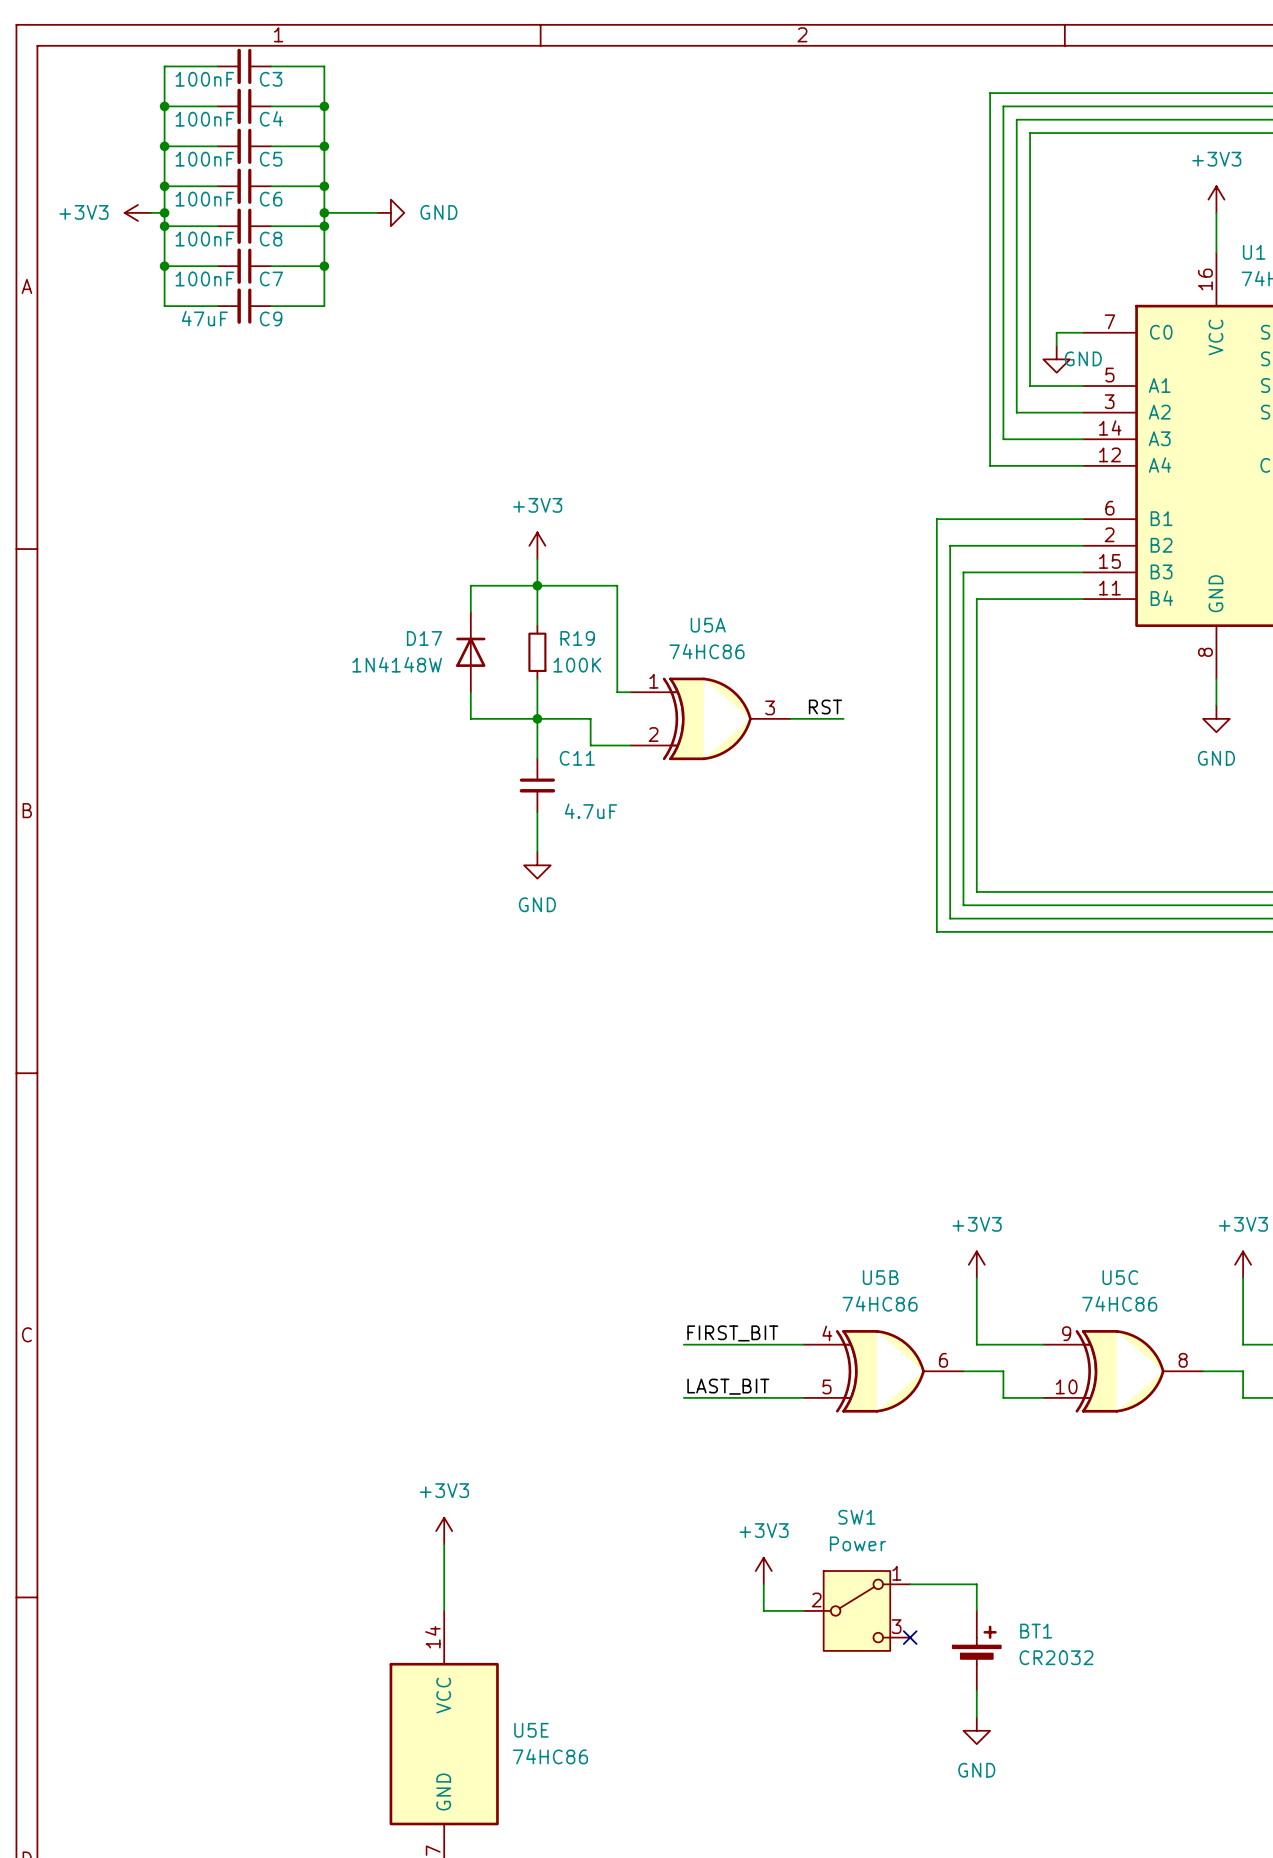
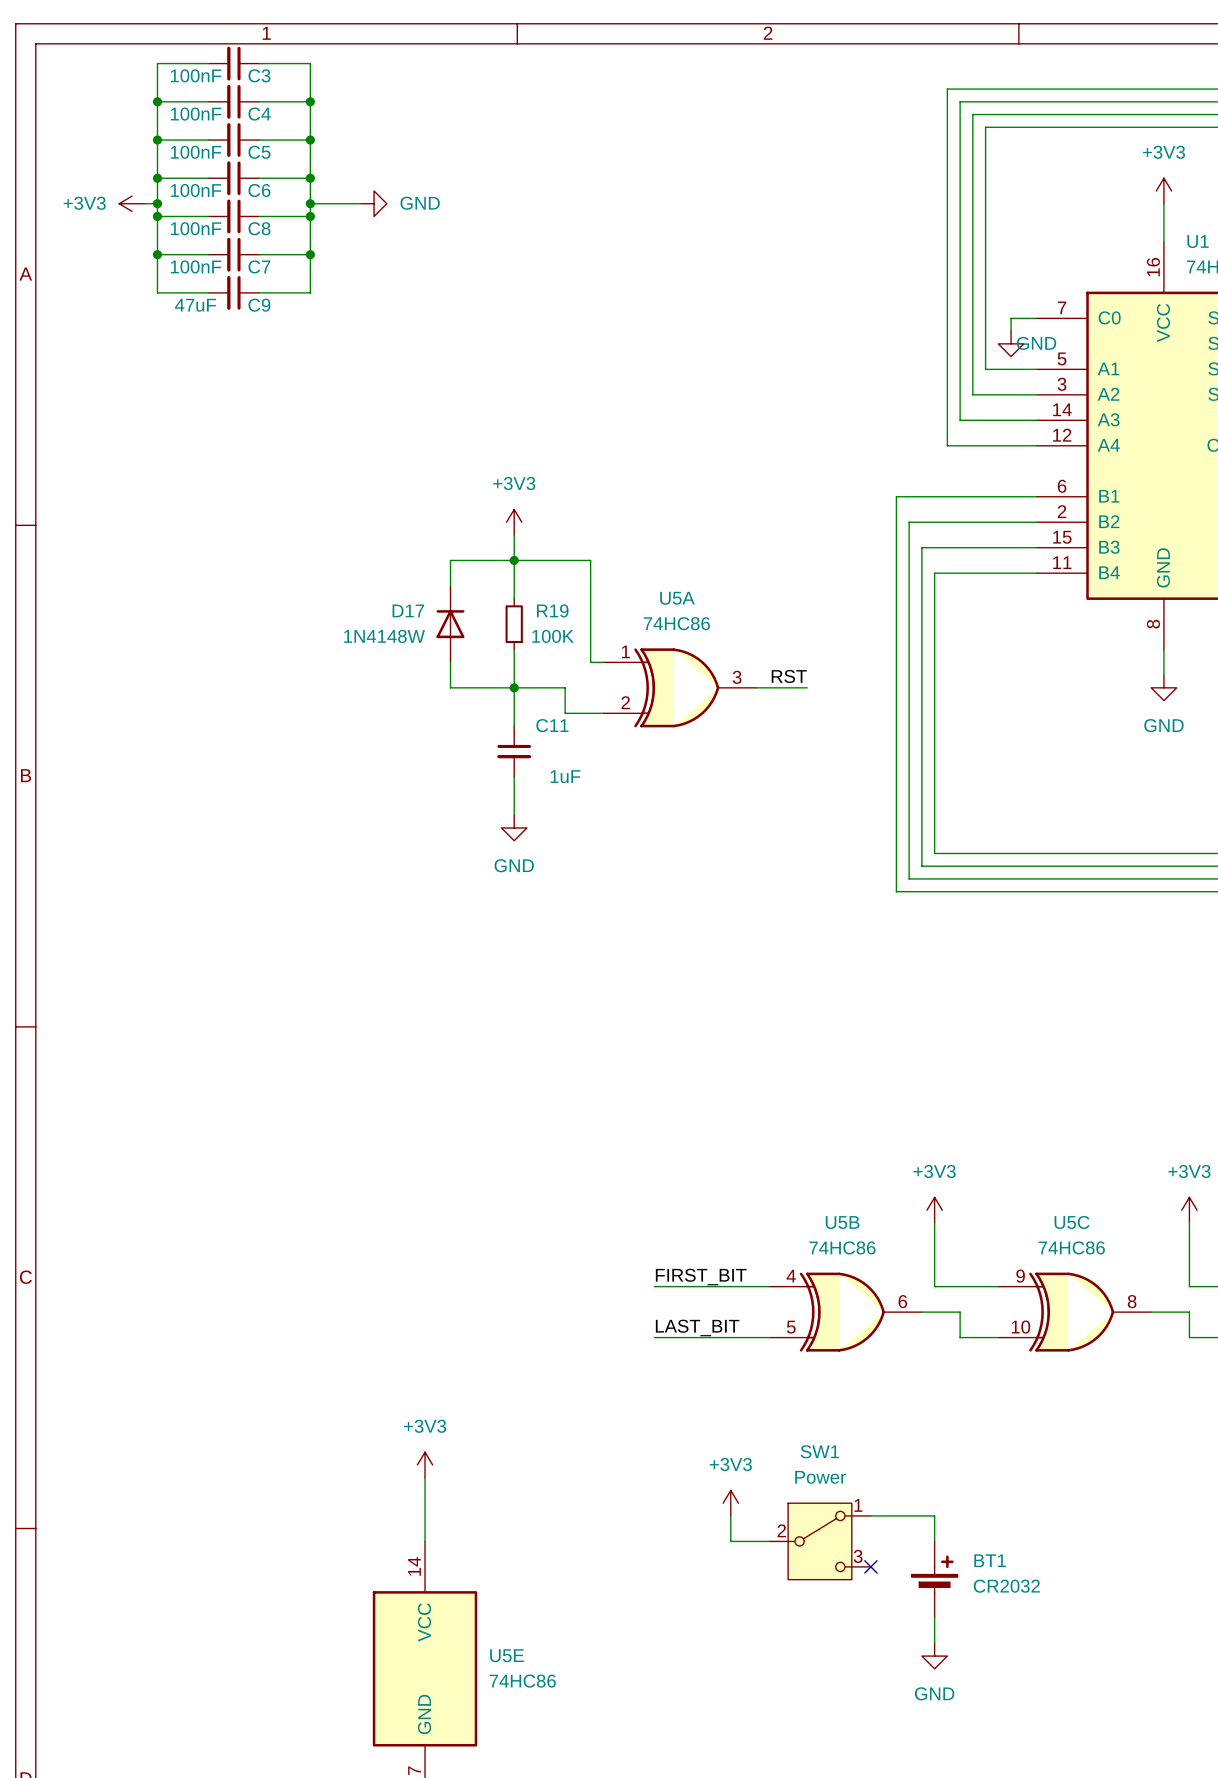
C11 value: 4.7uF (590, 811) -> 1uF (565, 776)

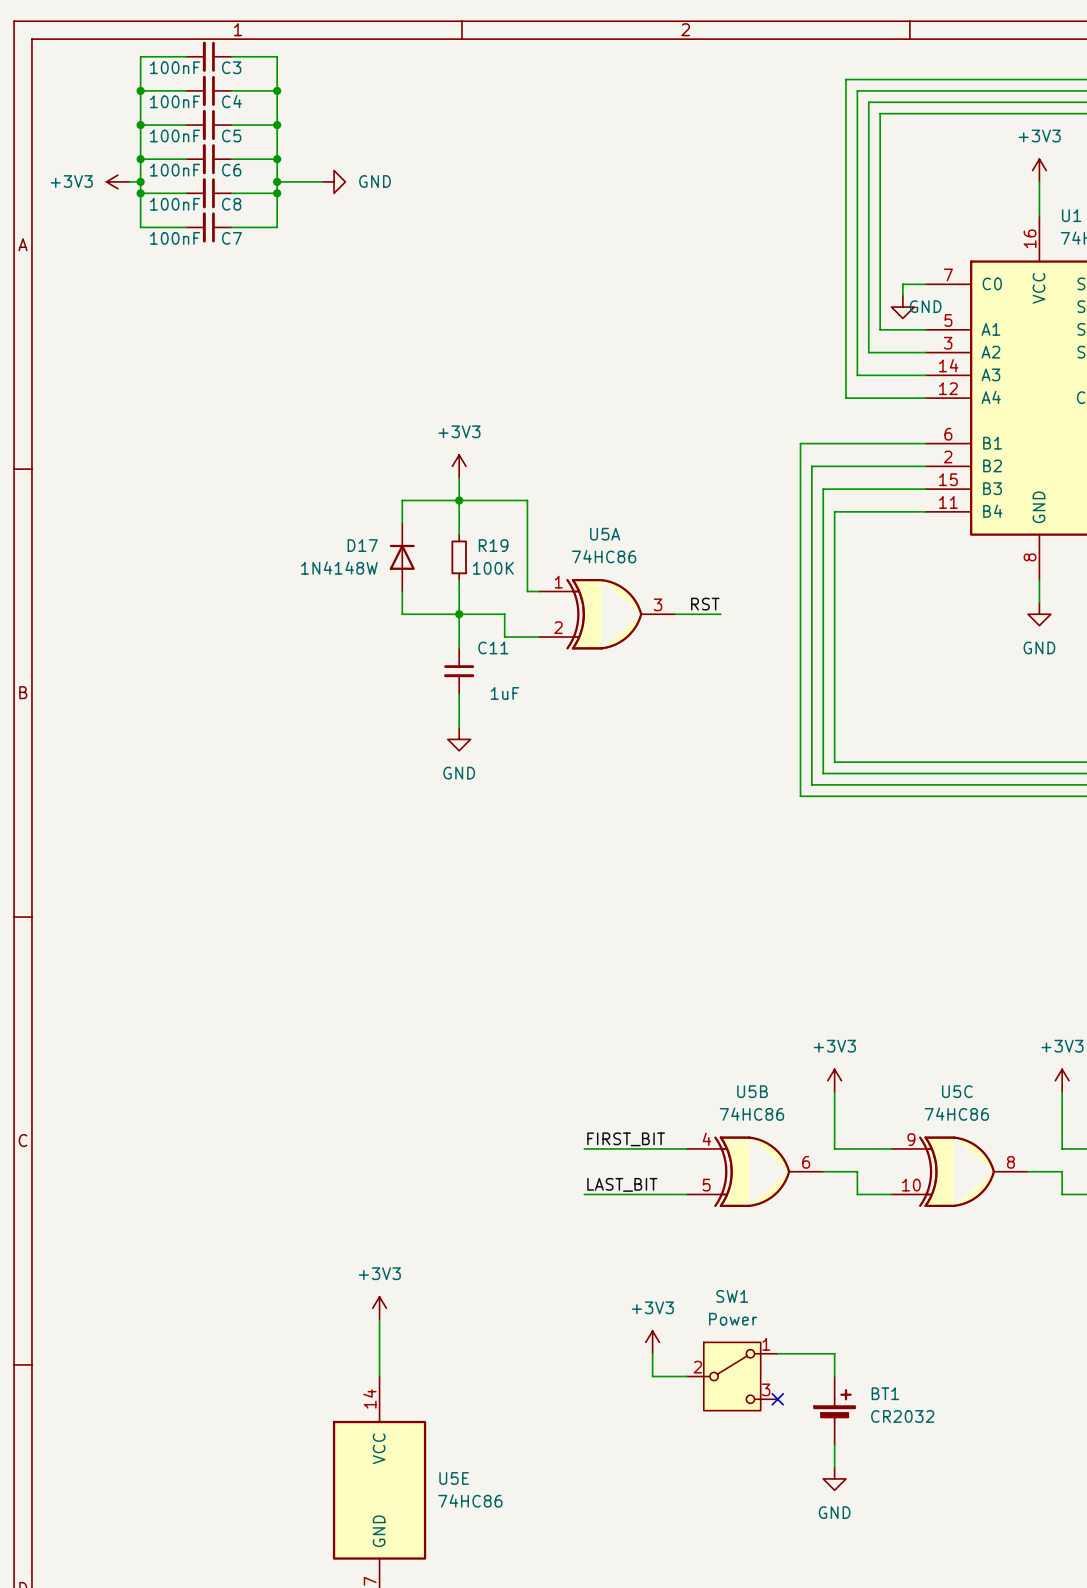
wire: (157, 254) (157, 292) (208, 292) -> none
junction: (157, 254) -> none
wire: (310, 254) (310, 292) (259, 292) -> none
junction: (310, 254) -> none
C9: 47uF (233, 292) -> none

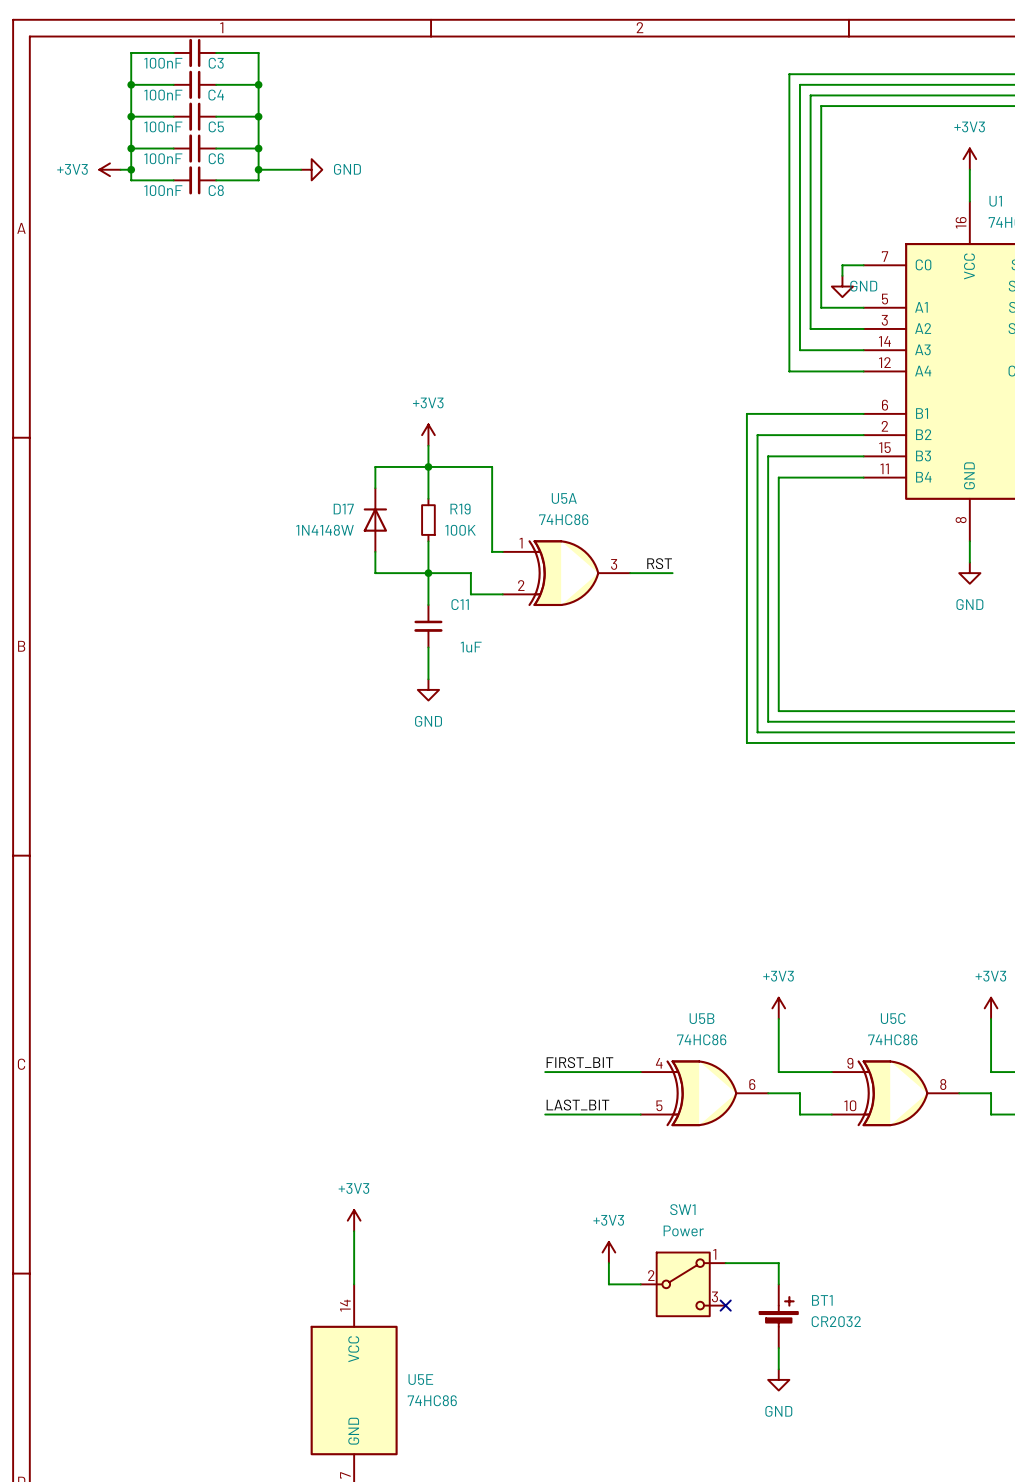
wire: (140, 193) (140, 227) (186, 227) -> none
junction: (140, 193) -> none
wire: (277, 193) (277, 227) (231, 227) -> none
junction: (277, 193) -> none
C7: 100nF (208, 227) -> none

